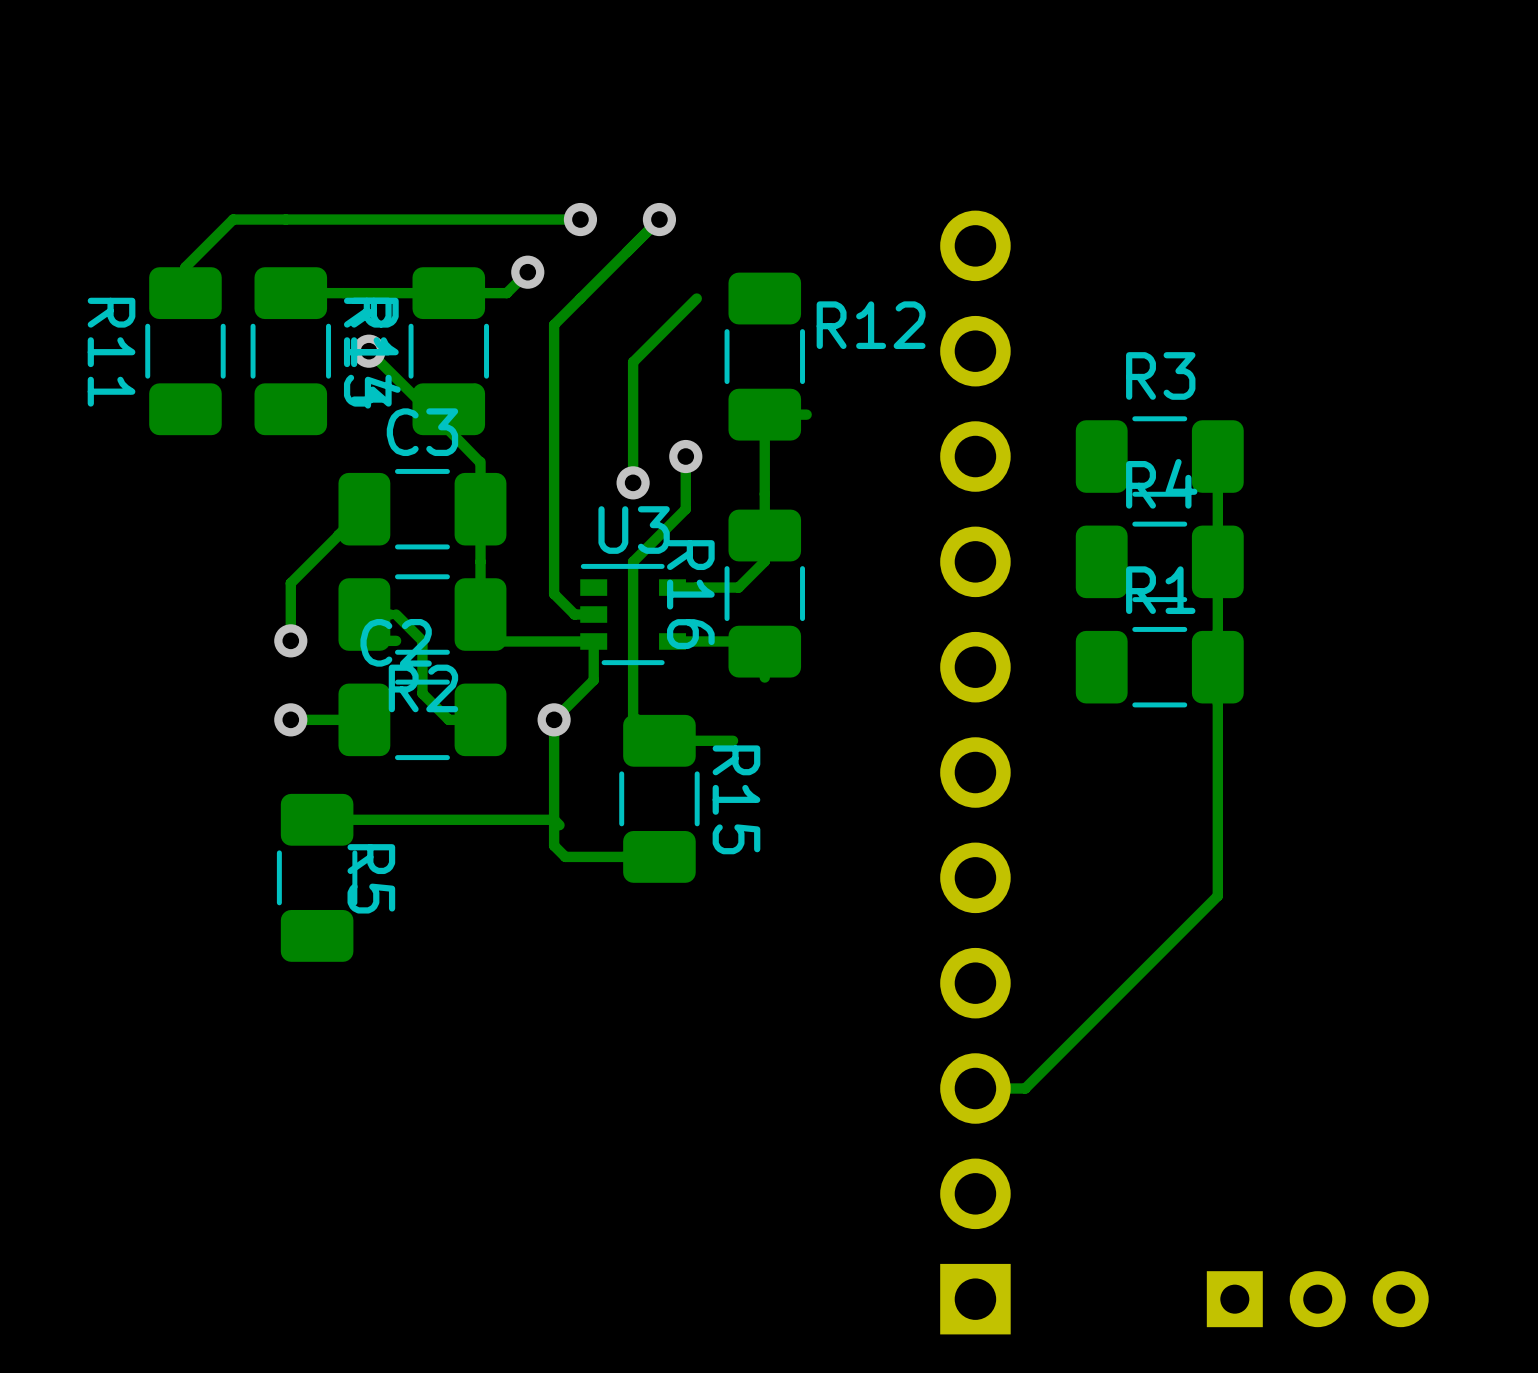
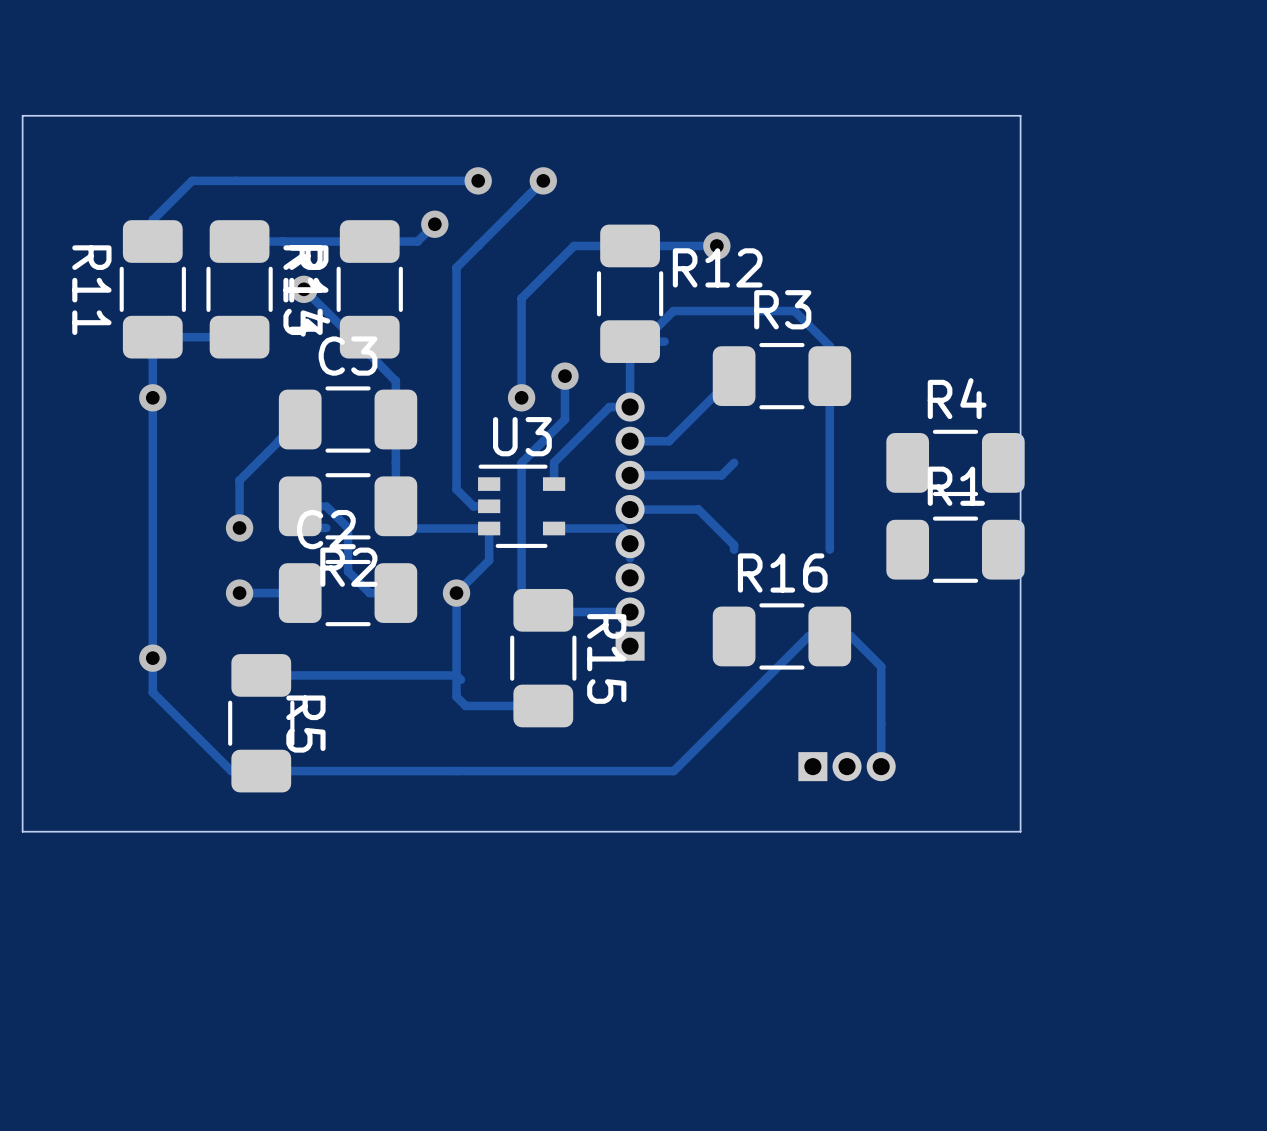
board edge: none -> (1020, 115) (22, 115) (22, 831) (1020, 831) (1020, 115)
track: none -> (716, 245) (574, 245)
via: none -> (716, 245)
track: none -> (651, 332) (673, 311) (794, 311) (829, 346) (829, 549)
track: none -> (239, 337) (152, 337) (152, 692) (231, 771) (673, 771) (808, 636) (851, 636) (881, 666) (881, 766)
track: (1217, 435) (1217, 895) (1025, 1088) (975, 1088) -> none
track: none -> (734, 376) (669, 441) (630, 441)
R3 position: (1159, 456) -> (781, 376)
via: none -> (152, 397)
track: (764, 494) (764, 561) (738, 587) (672, 587) -> (630, 407) (609, 407) (554, 462) (554, 484)
track: none -> (734, 462) (721, 475) (630, 475)
R16 rotation: 0° (764, 593) -> 90° clockwise (781, 636)
R16 position: (764, 593) -> (781, 636)
track: none -> (630, 509) (698, 509) (734, 545) (734, 549)
part: none -> (630, 526)
track: (733, 740) (659, 740) -> none
track: none -> (630, 612) (567, 612)
part: (975, 772) -> none
via: none -> (152, 658)
part: none -> (847, 766)
part: (1317, 1299) -> none

